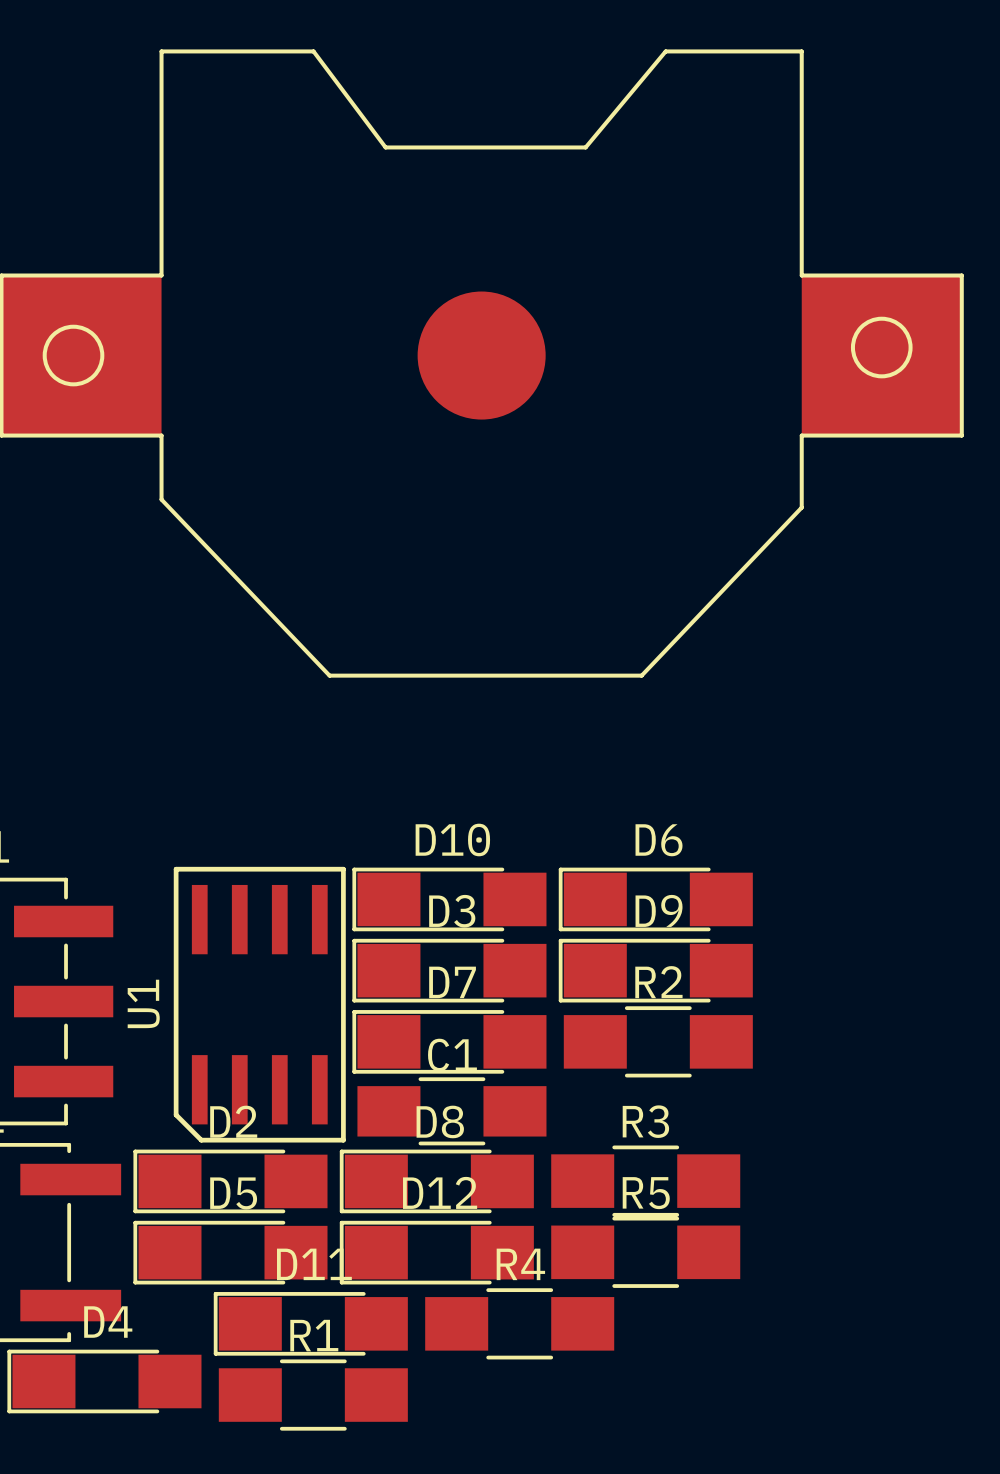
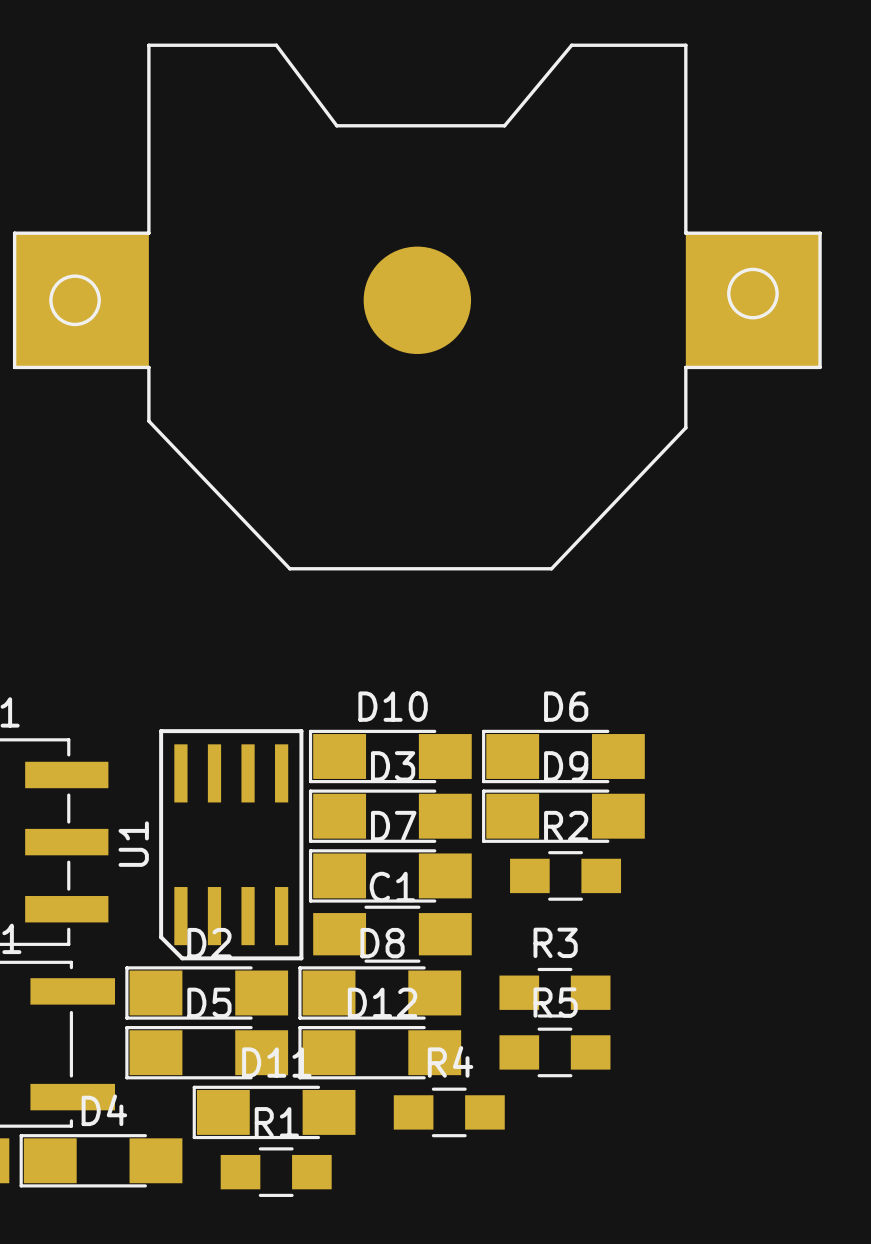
R2 footprint: [563, 1006, 753, 1078] -> [510, 851, 622, 901]
R3 footprint: [551, 1145, 741, 1217] -> [499, 967, 611, 1018]
R5 footprint: [551, 1216, 741, 1288] -> [499, 1027, 611, 1078]
R4 footprint: [425, 1288, 615, 1360] -> [393, 1087, 505, 1138]
R1 footprint: [218, 1359, 408, 1431] -> [220, 1147, 332, 1197]

